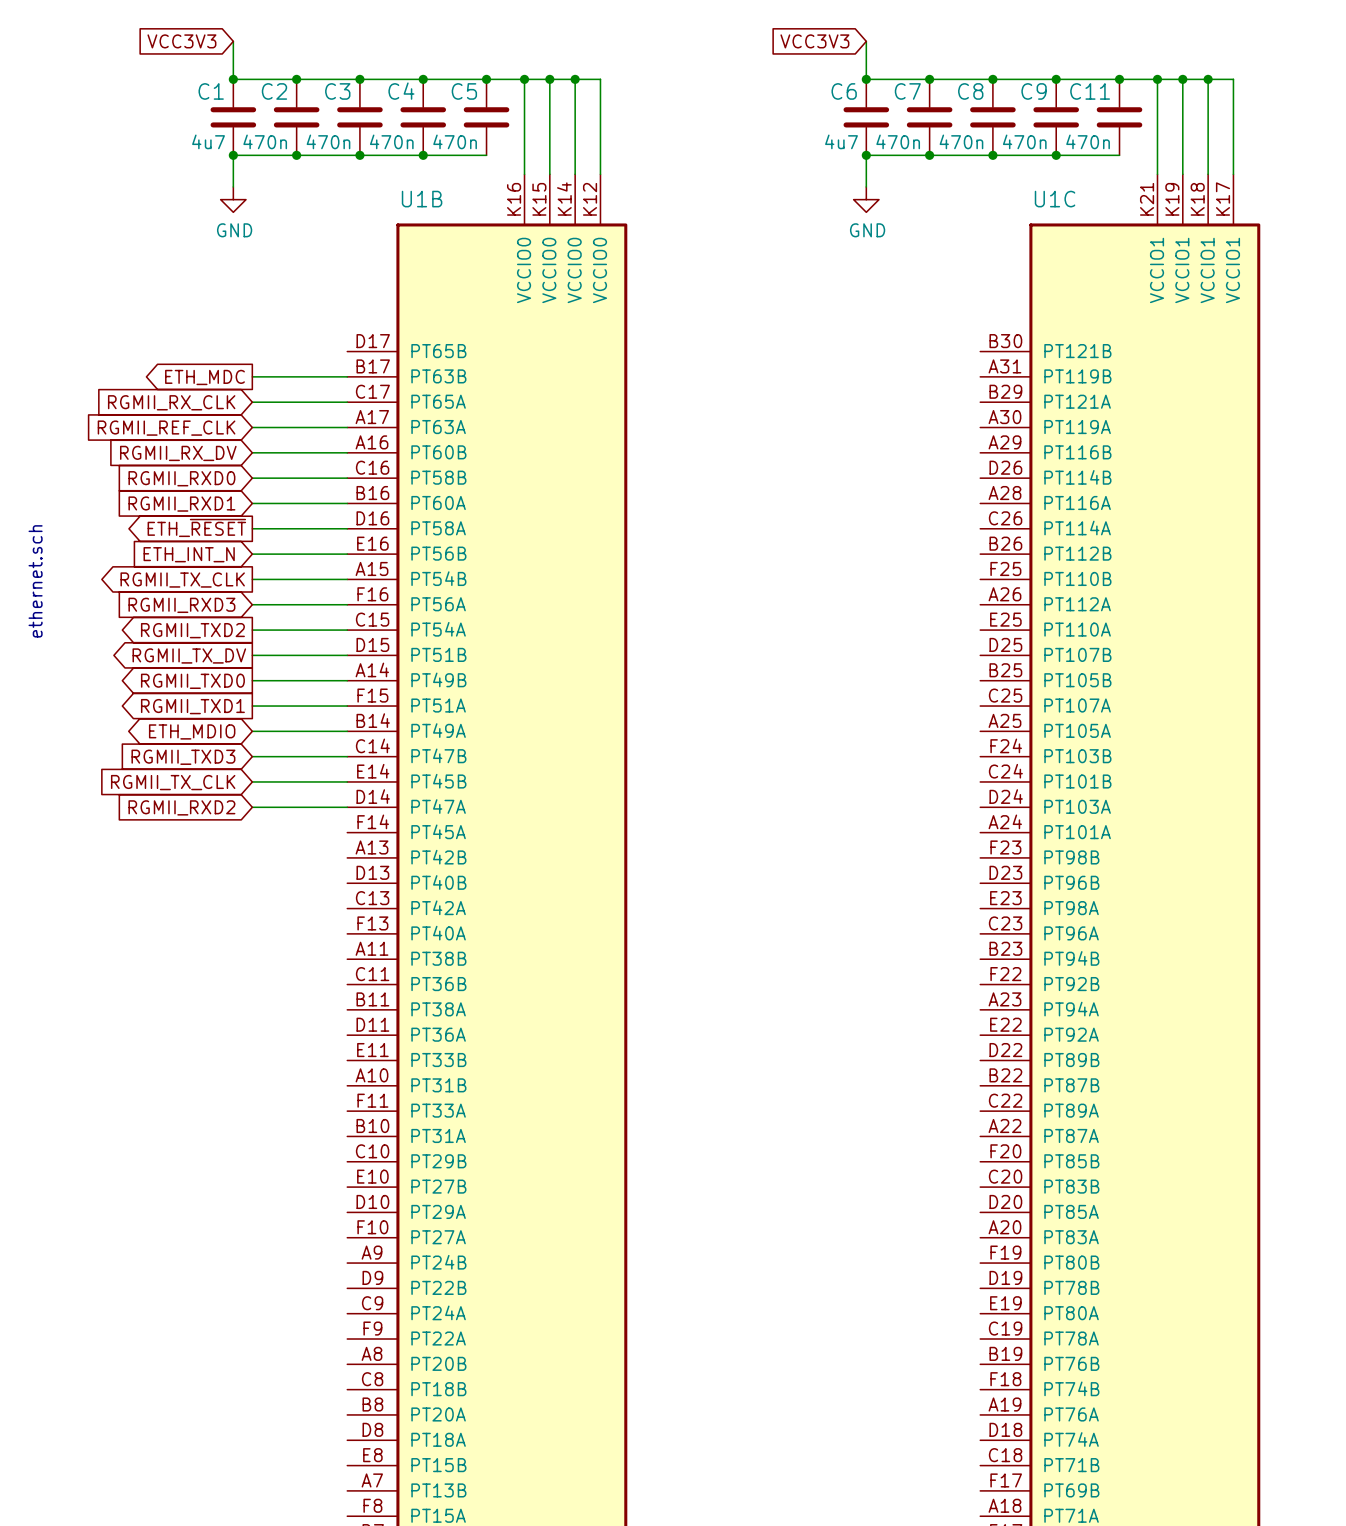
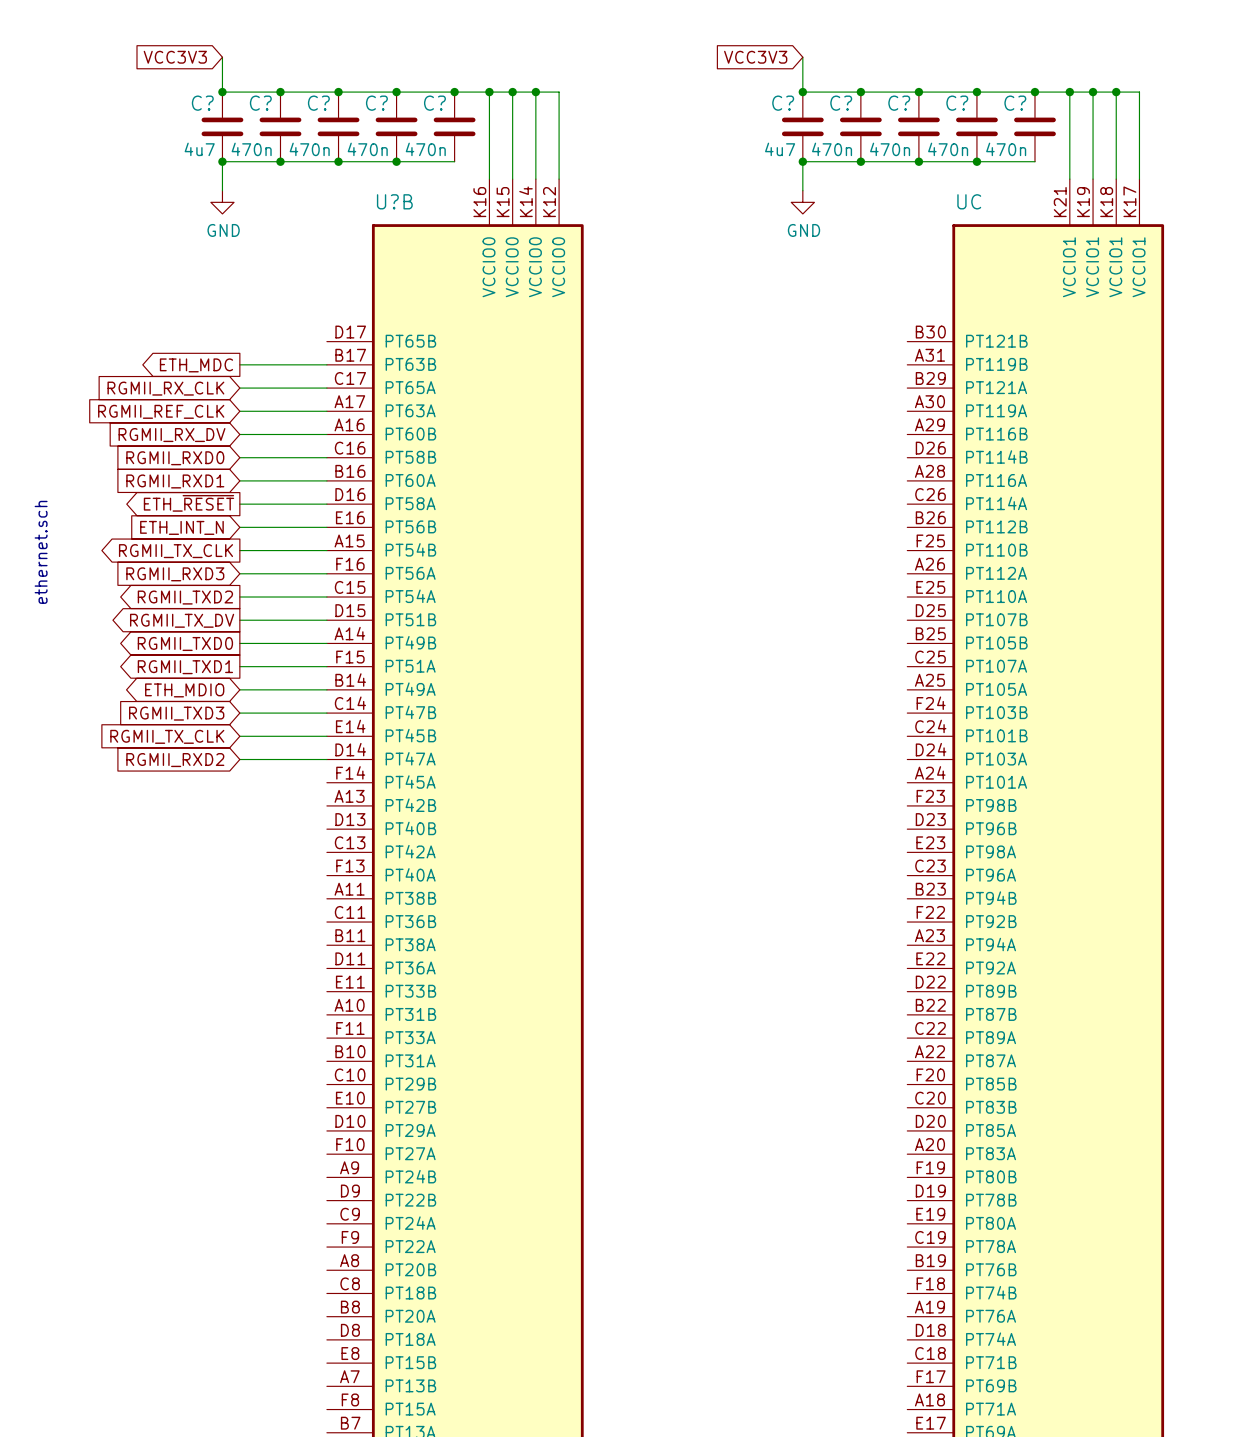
C1 name: C1 (211, 91) -> C? (202, 103)
C2 name: C2 (274, 91) -> C? (260, 103)
C3 name: C3 (337, 91) -> C? (318, 103)
C4 name: C4 (401, 91) -> C? (376, 103)
C5 name: C5 (464, 91) -> C? (434, 103)
C6 name: C6 (844, 91) -> C? (783, 103)
C7 name: C7 (907, 91) -> C? (841, 103)
C8 name: C8 (970, 91) -> C? (899, 103)
C9 name: C9 (1034, 91) -> C? (957, 103)
C11 name: C11 (1090, 91) -> C? (1015, 103)
U1B name: U1B (422, 199) -> U?B (394, 201)
U1C name: U1C (1055, 199) -> UC (969, 201)

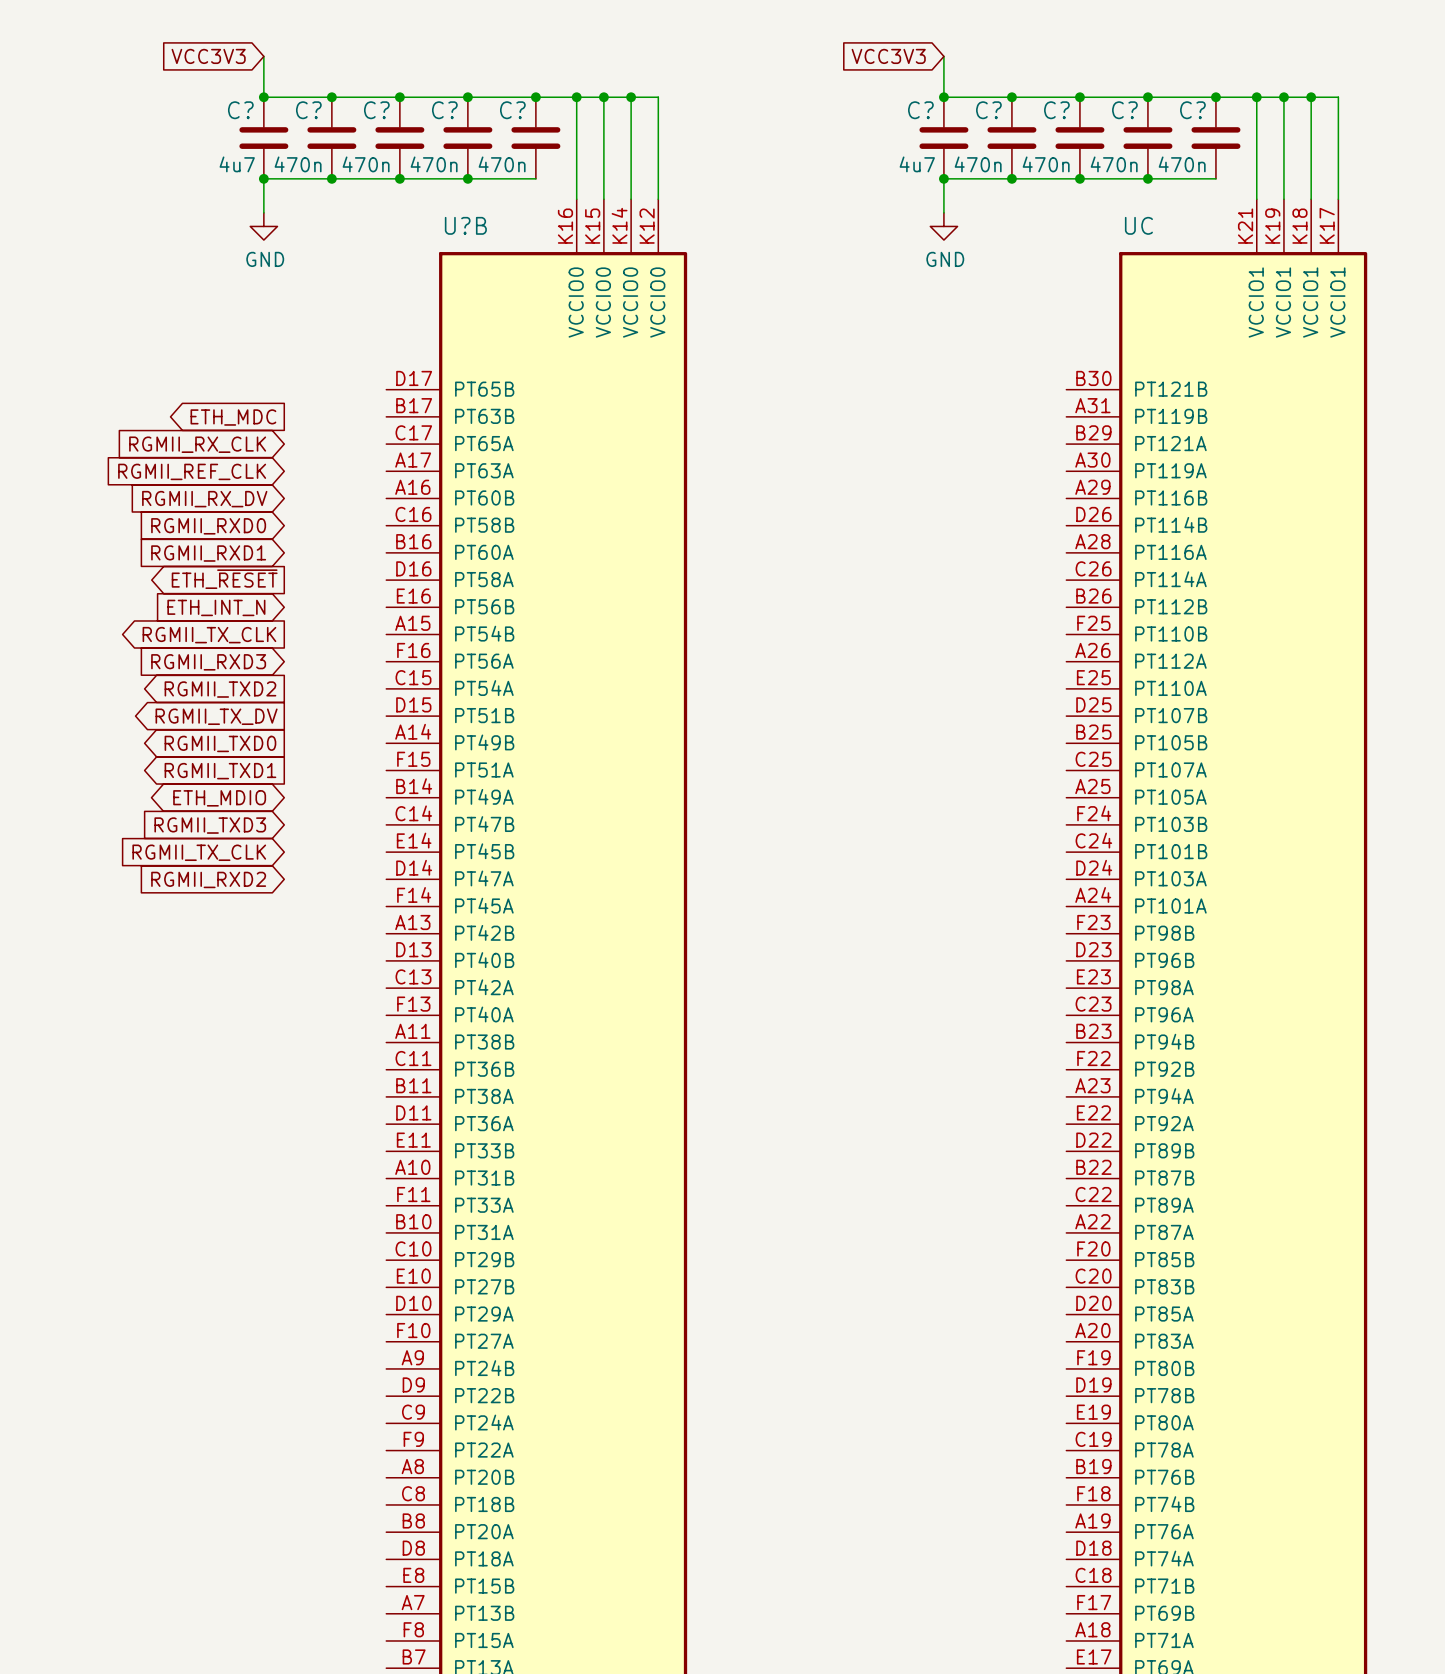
wire: (239, 364) (326, 364) -> none
wire: (239, 388) (326, 388) -> none
wire: (239, 411) (326, 411) -> none
wire: (239, 434) (326, 434) -> none
wire: (239, 457) (326, 457) -> none
wire: (239, 480) (326, 480) -> none
wire: (239, 504) (326, 504) -> none
wire: (239, 527) (326, 527) -> none
wire: (239, 550) (326, 550) -> none
text: ethernet.sch (41, 552) -> none
wire: (239, 573) (326, 573) -> none
wire: (239, 597) (326, 597) -> none
wire: (239, 620) (326, 620) -> none
wire: (239, 643) (326, 643) -> none
wire: (239, 666) (326, 666) -> none
wire: (239, 689) (326, 689) -> none
wire: (239, 713) (326, 713) -> none
wire: (239, 736) (326, 736) -> none
wire: (239, 759) (326, 759) -> none

